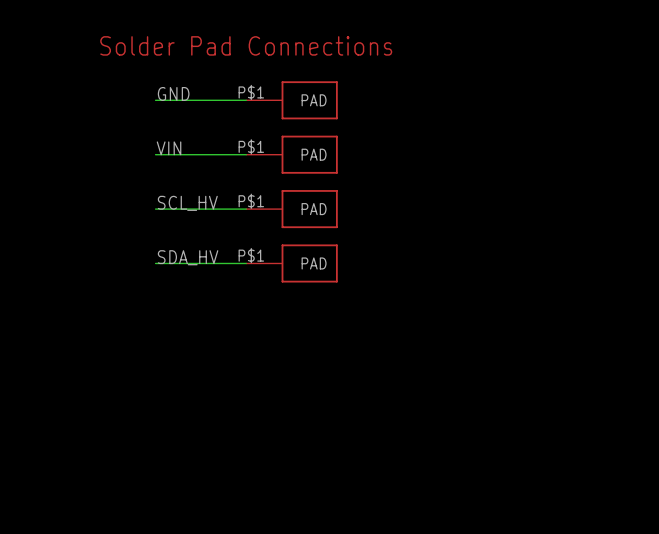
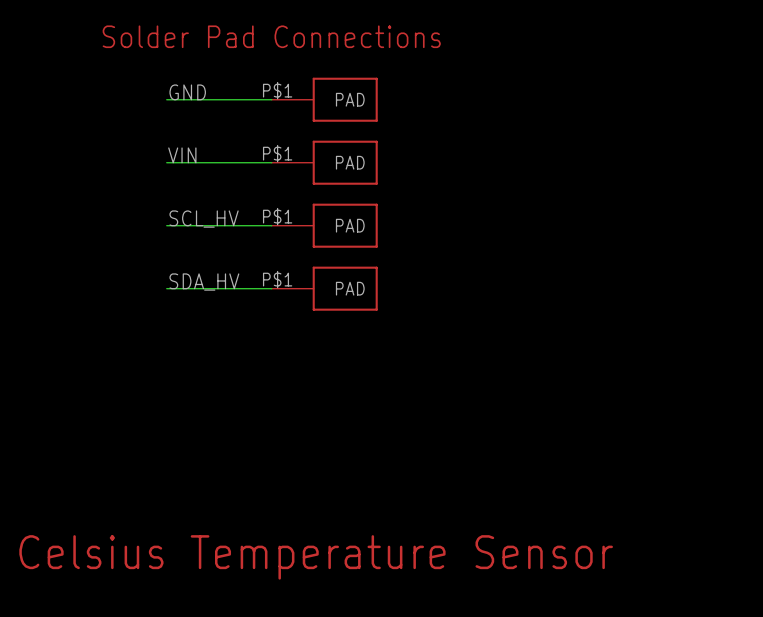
text: none -> Celsius Temperature Sensor (316, 557)

